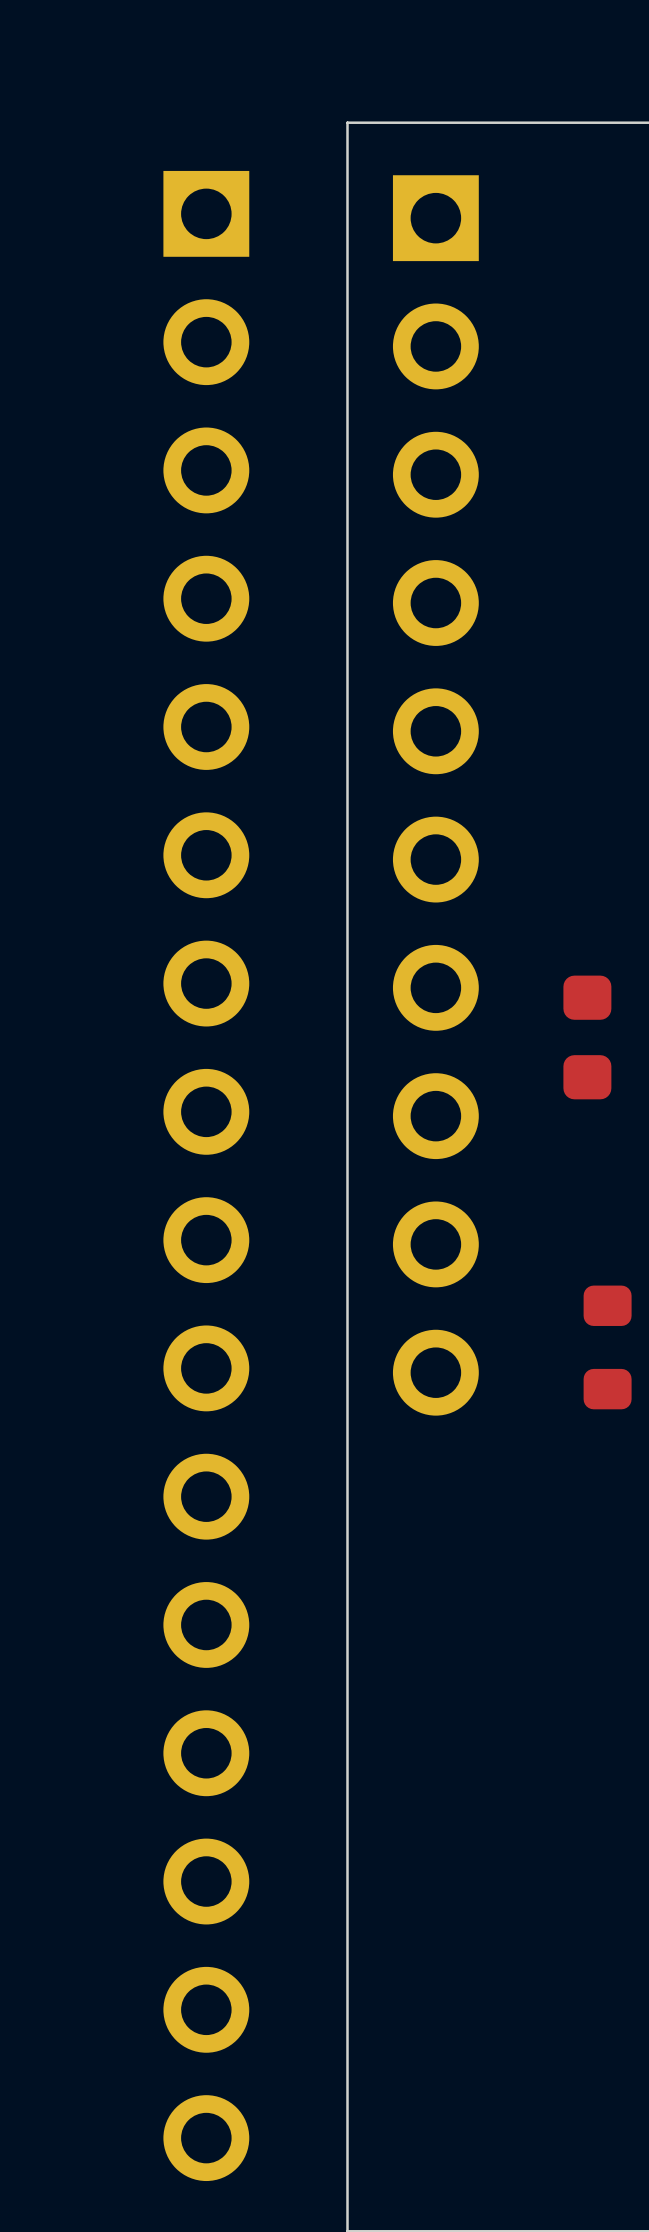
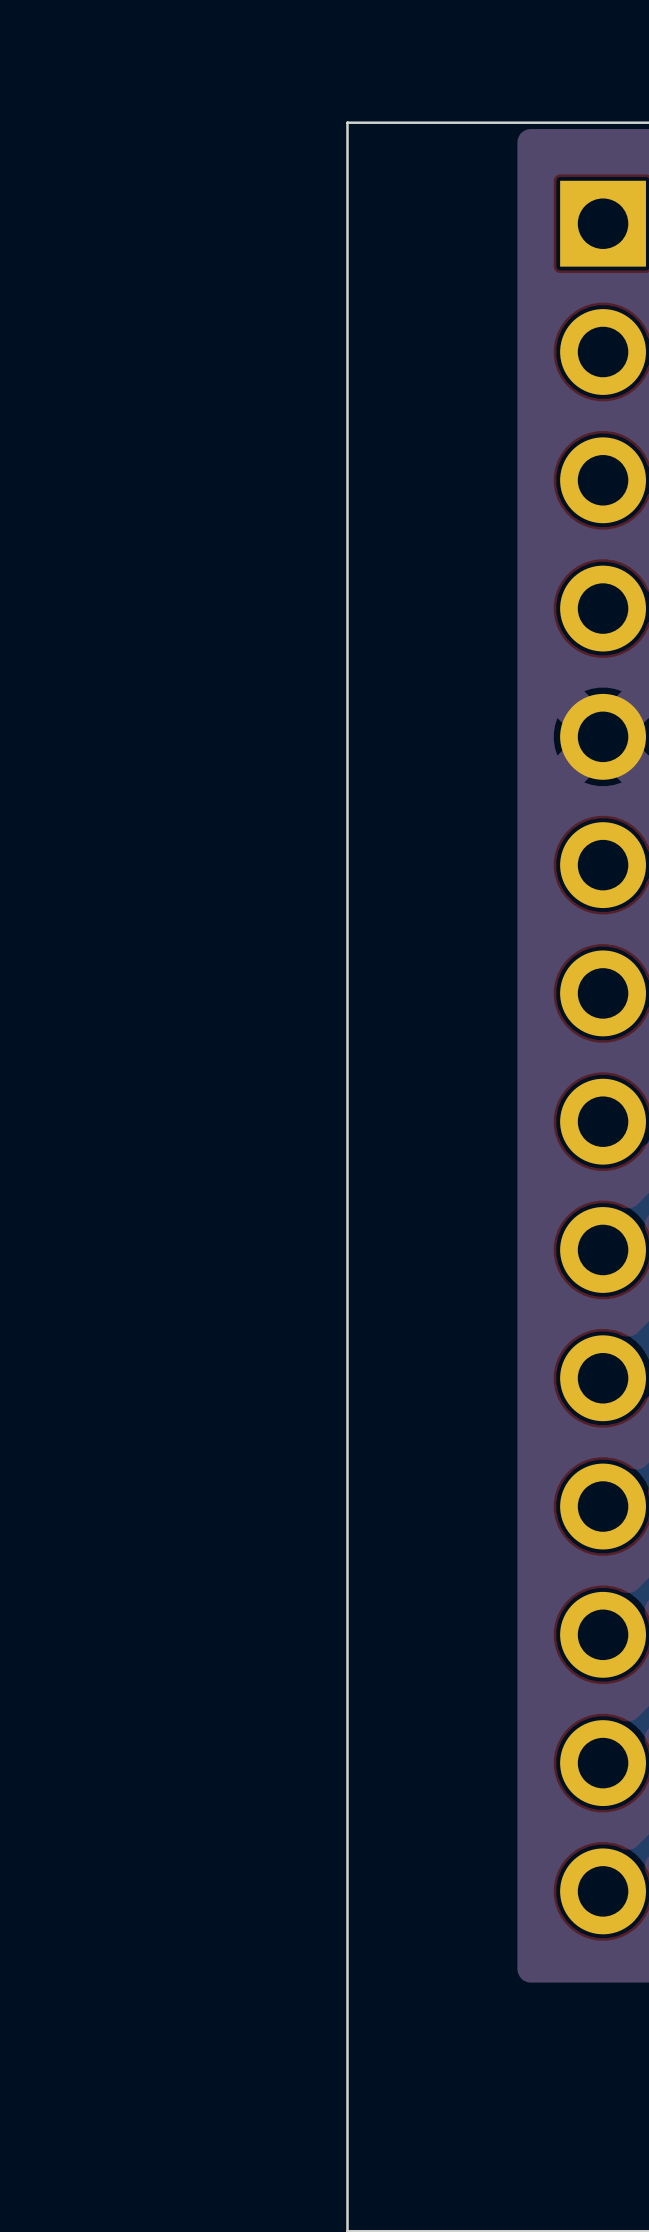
part: (435, 795) -> none
part footprint: [563, 975, 612, 1100] -> [560, 180, 646, 1935]
part: (206, 1175) -> none
part: (607, 1347) -> none

